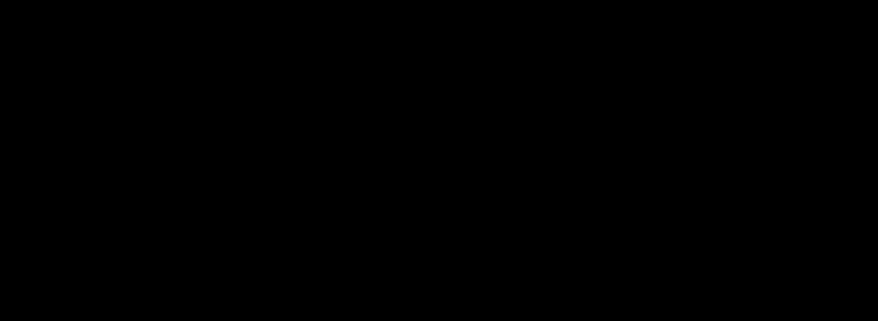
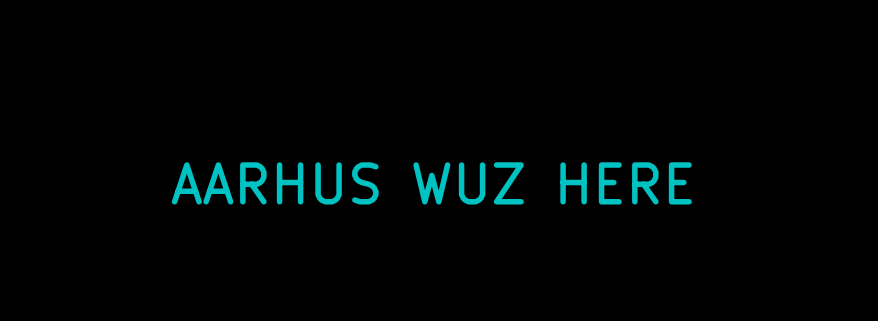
text: none -> AARHUS WUZ HERE (431, 183)

